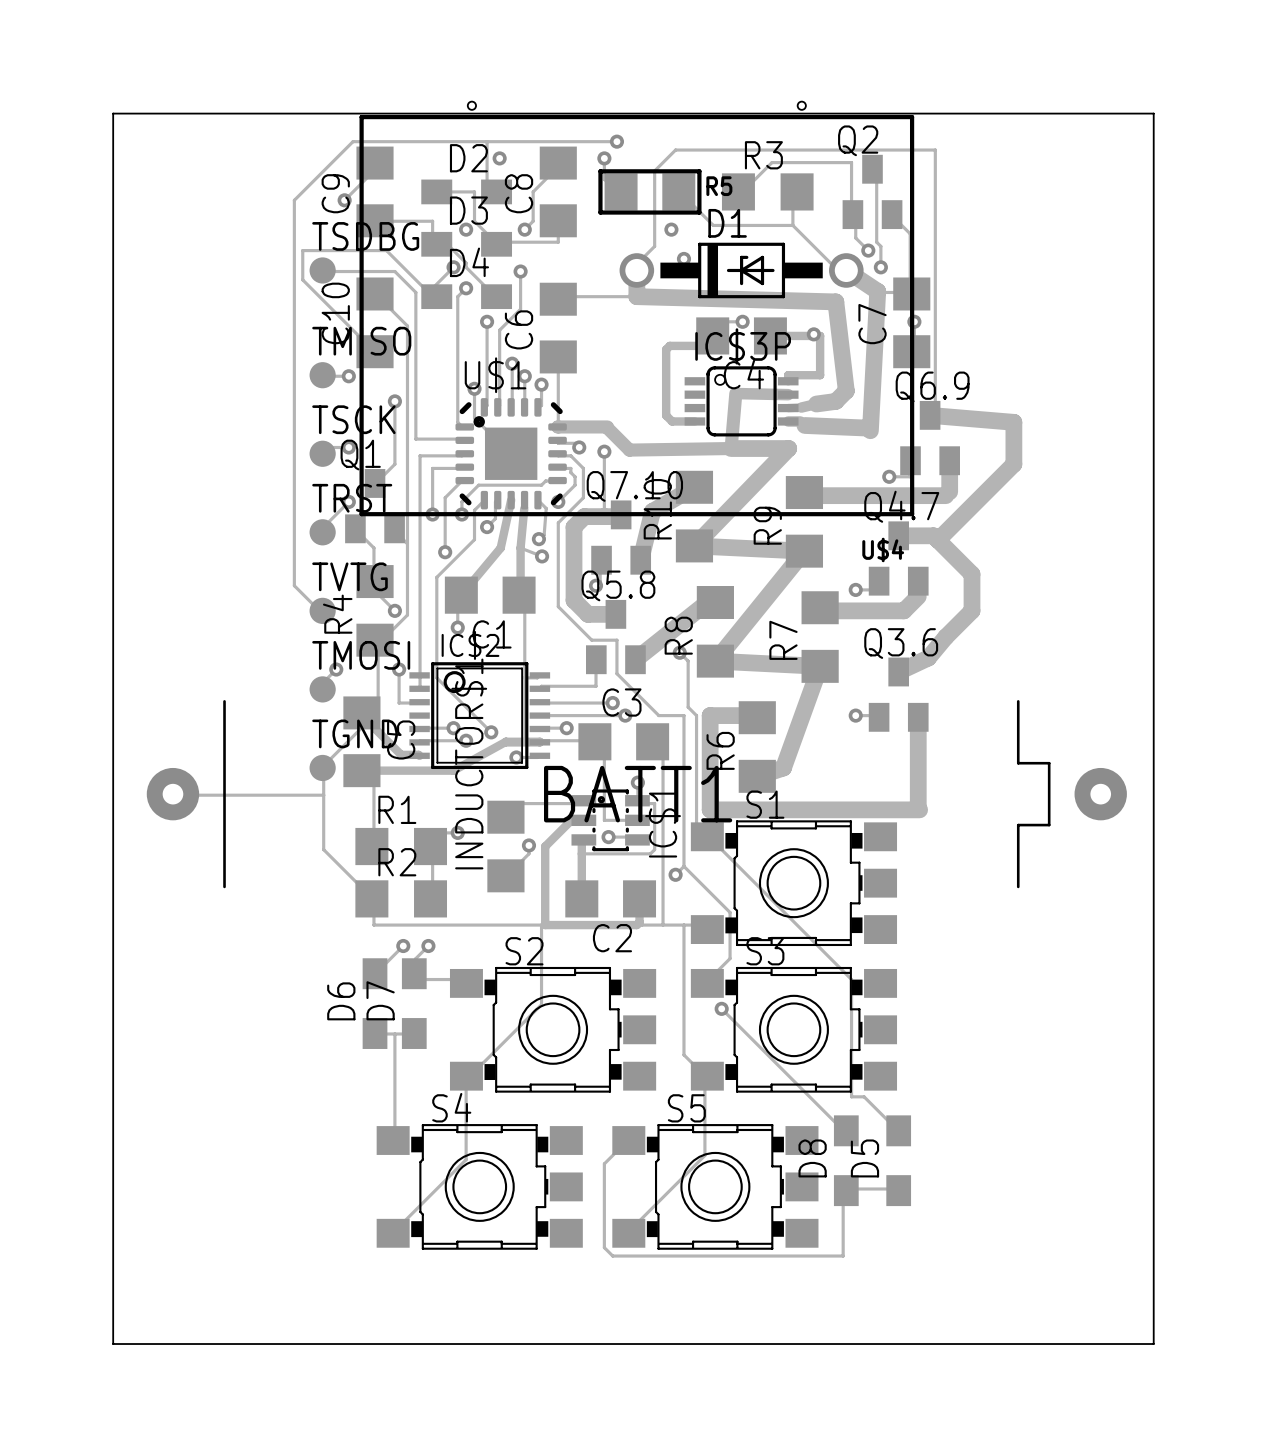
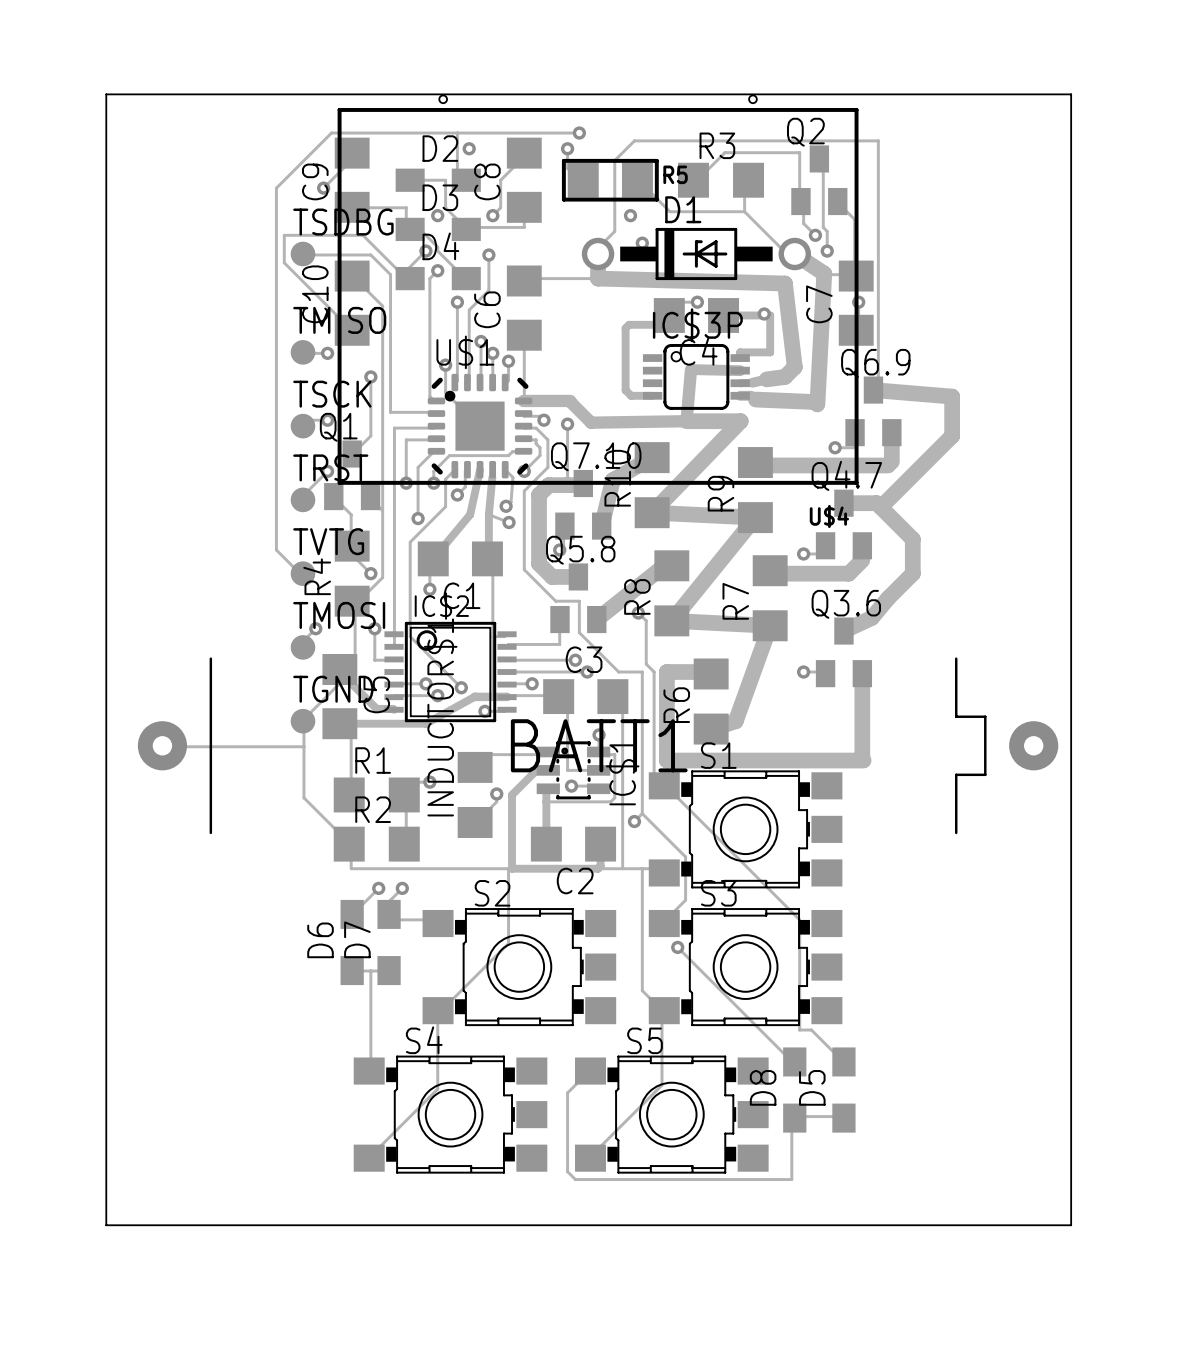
board edge: (113, 113) (1153, 113) (1153, 1344) (113, 1344) (113, 1304) -> (106, 106) (106, 94) (1071, 94) (1071, 1225) (106, 1225)

